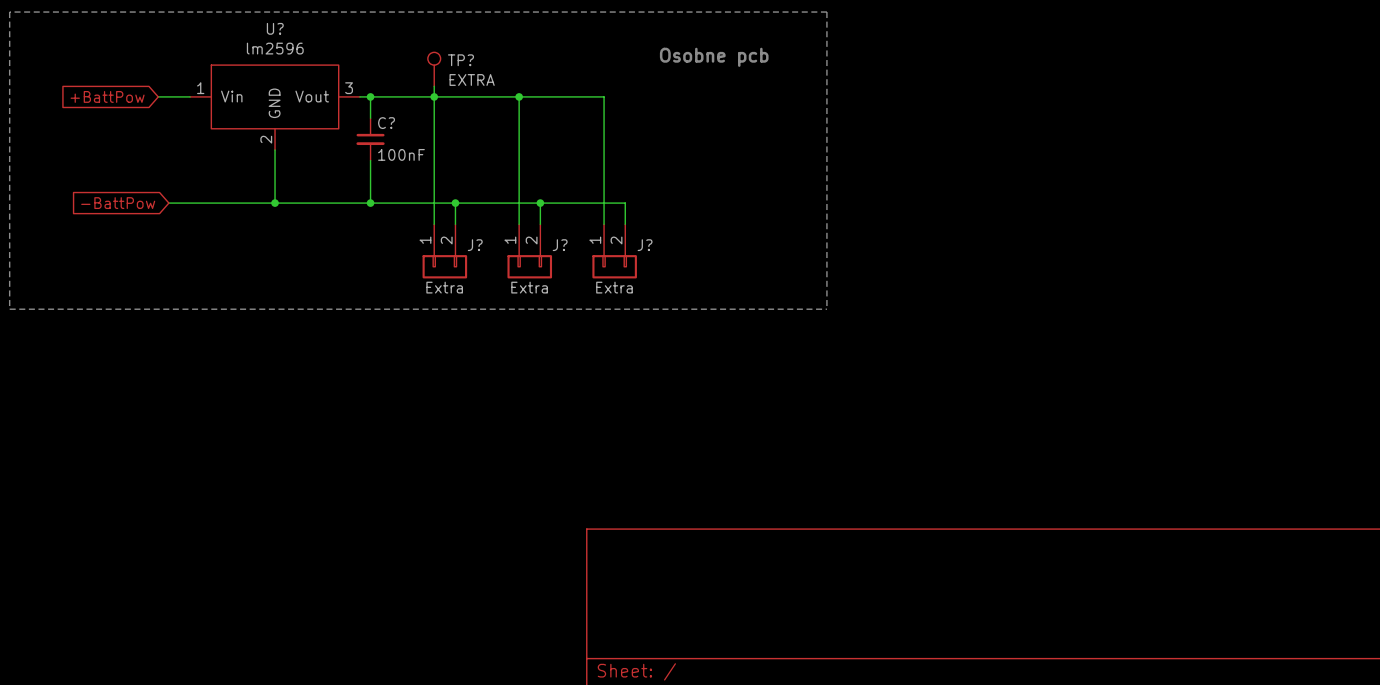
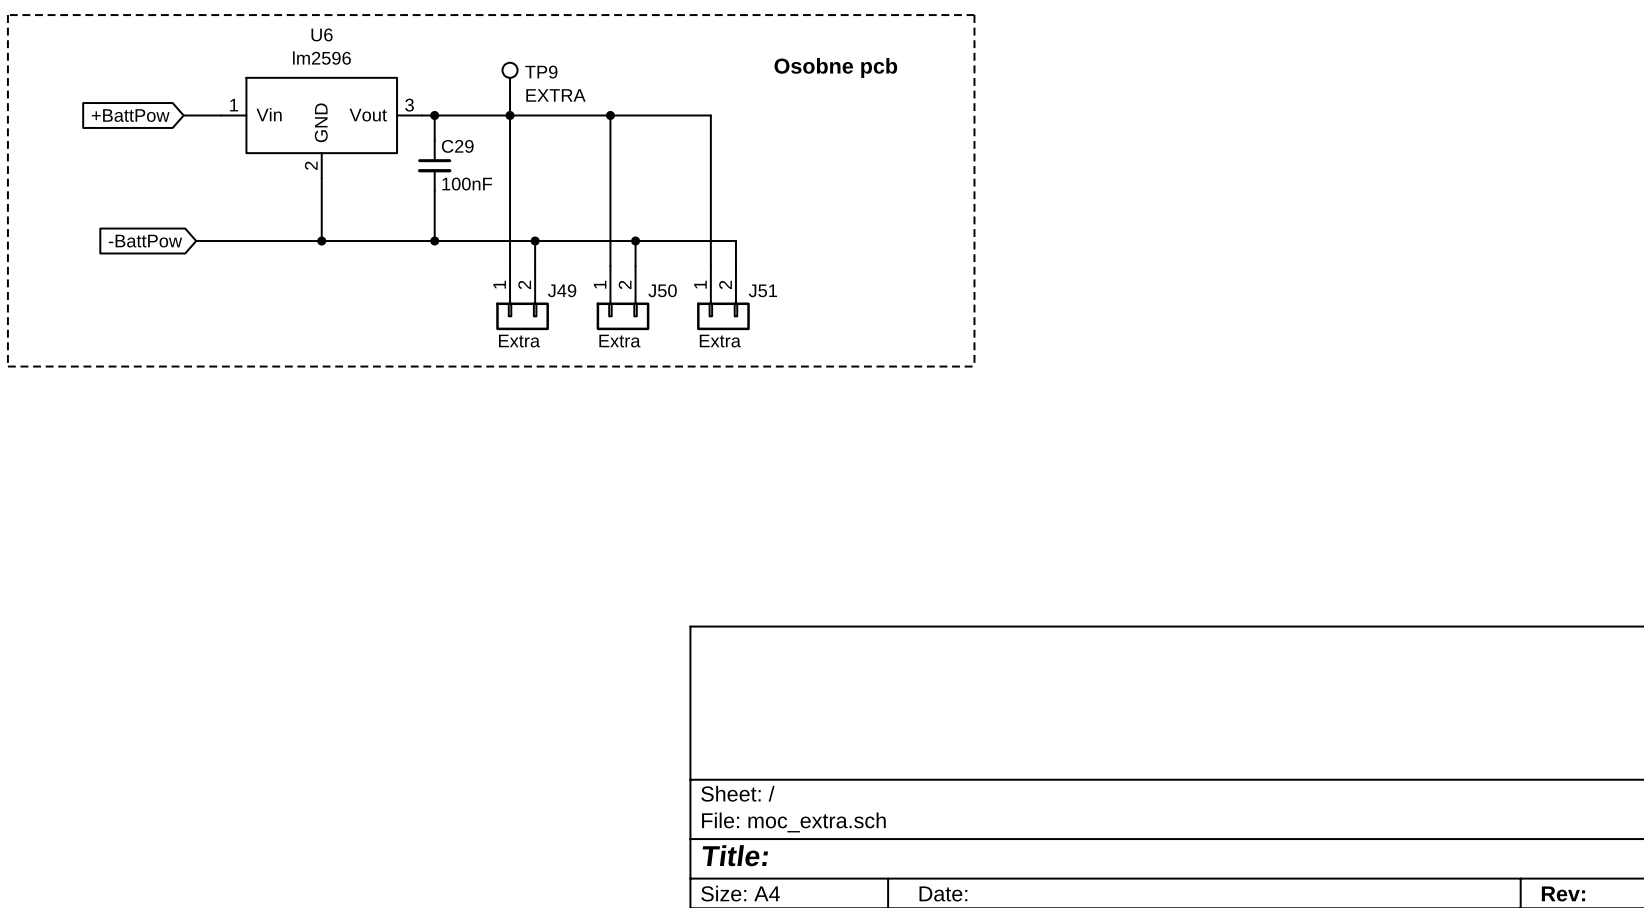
U? name: U? (275, 28) -> U6 (322, 34)
TP? name: TP? (460, 60) -> TP9 (541, 72)
C? name: C? (386, 123) -> C29 (457, 146)
J? name: J? (475, 245) -> J49 (562, 290)
J? name: J? (560, 245) -> J50 (662, 290)
J? name: J? (645, 245) -> J51 (762, 290)

